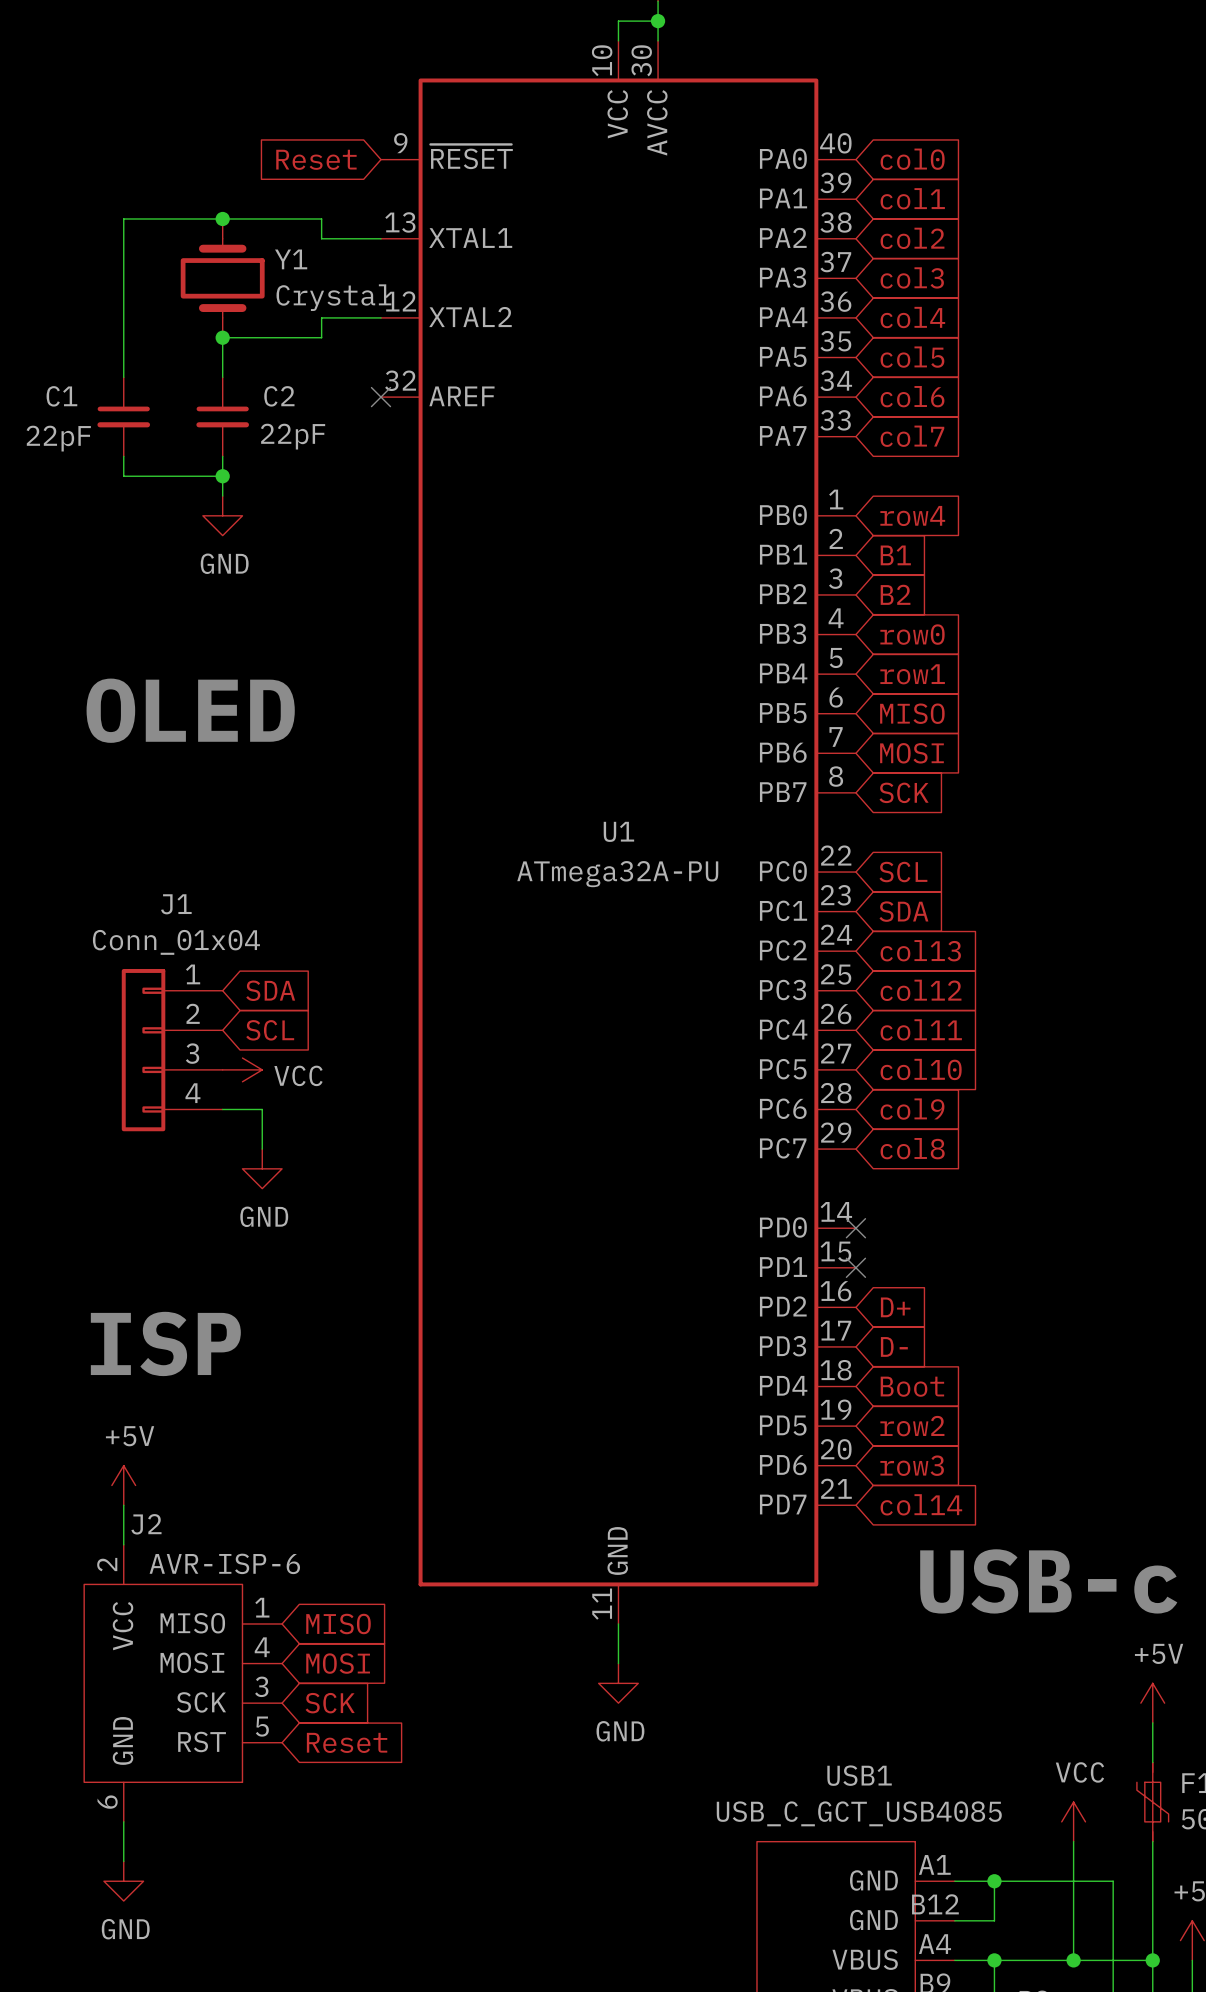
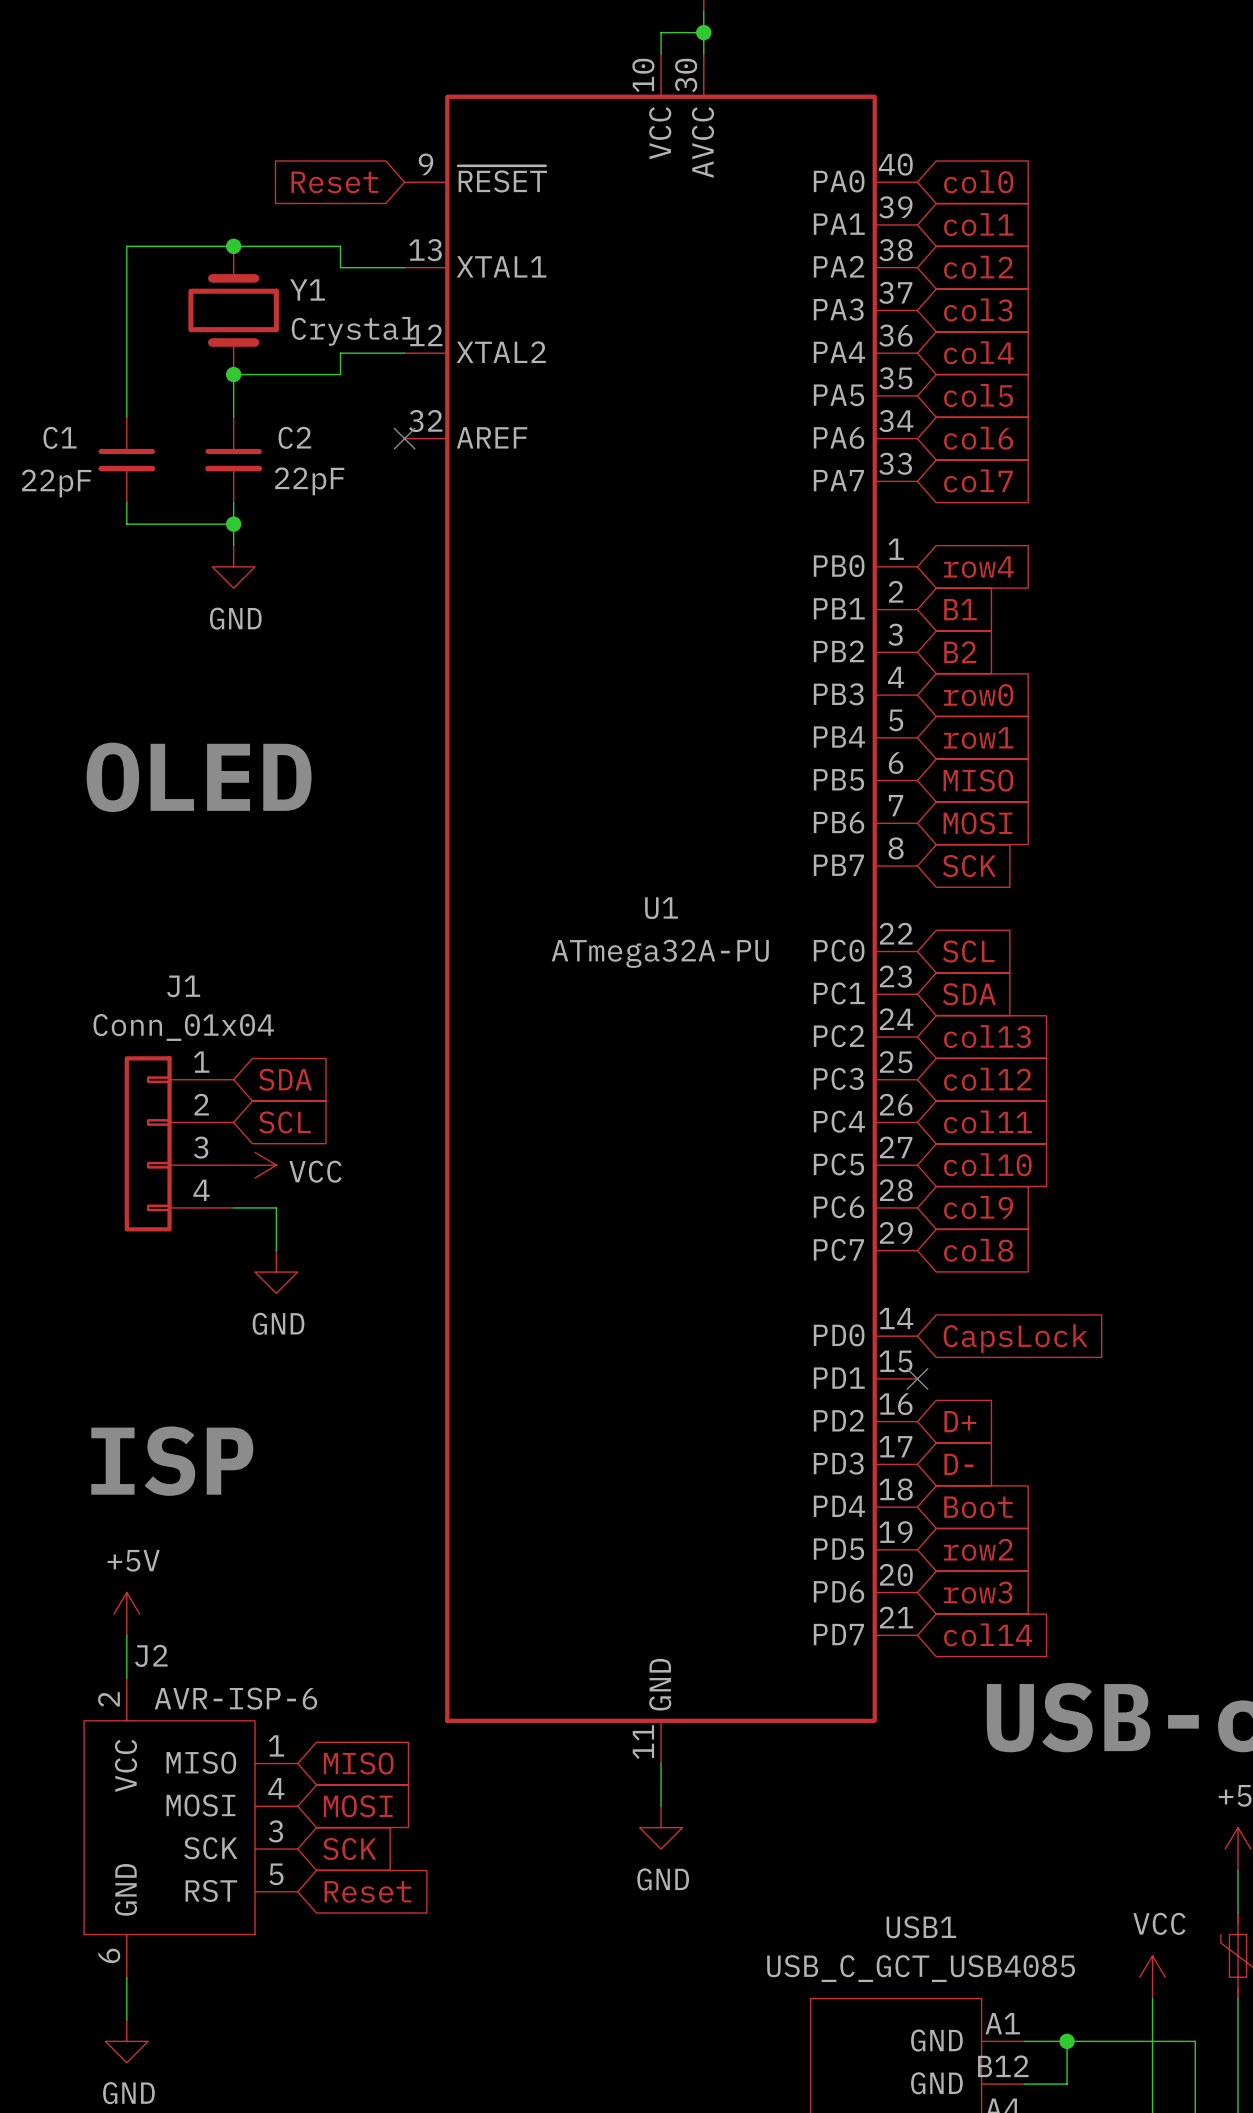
no-connect mark: (855, 1228) -> none
global label: none -> CapsLock (1015, 1338)

